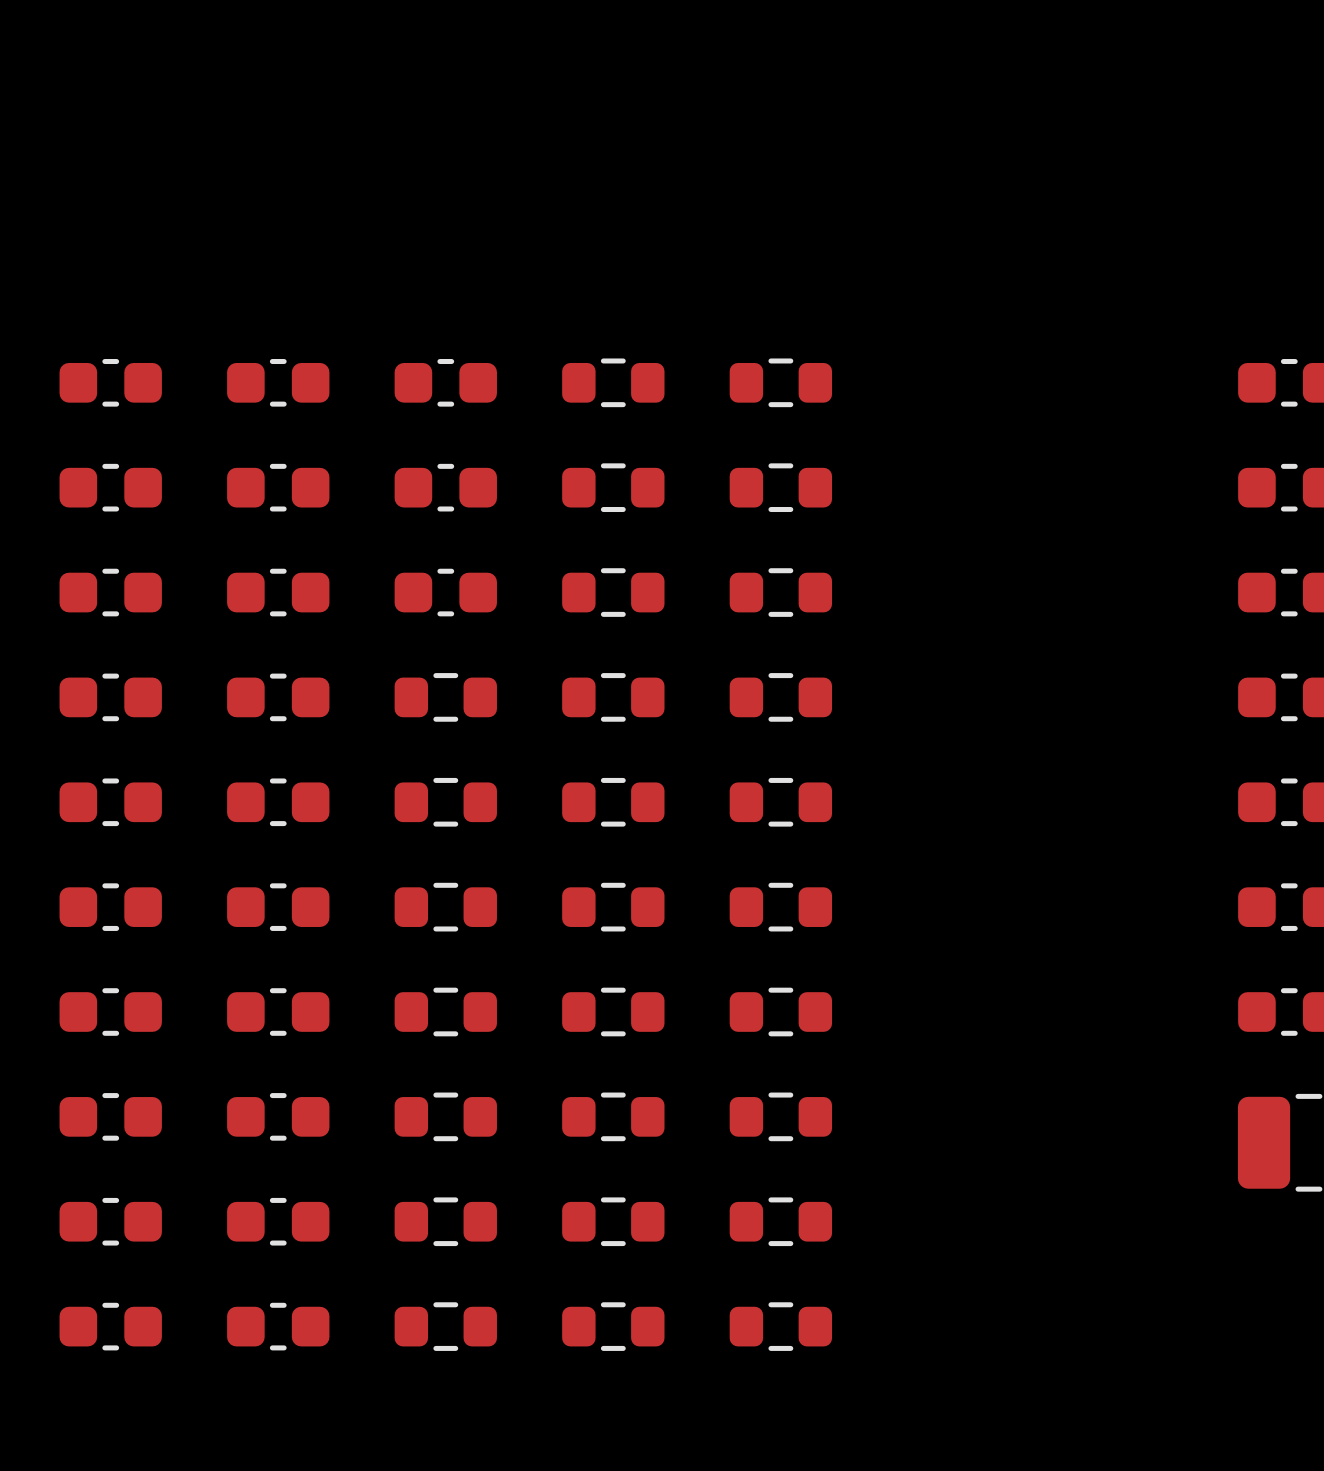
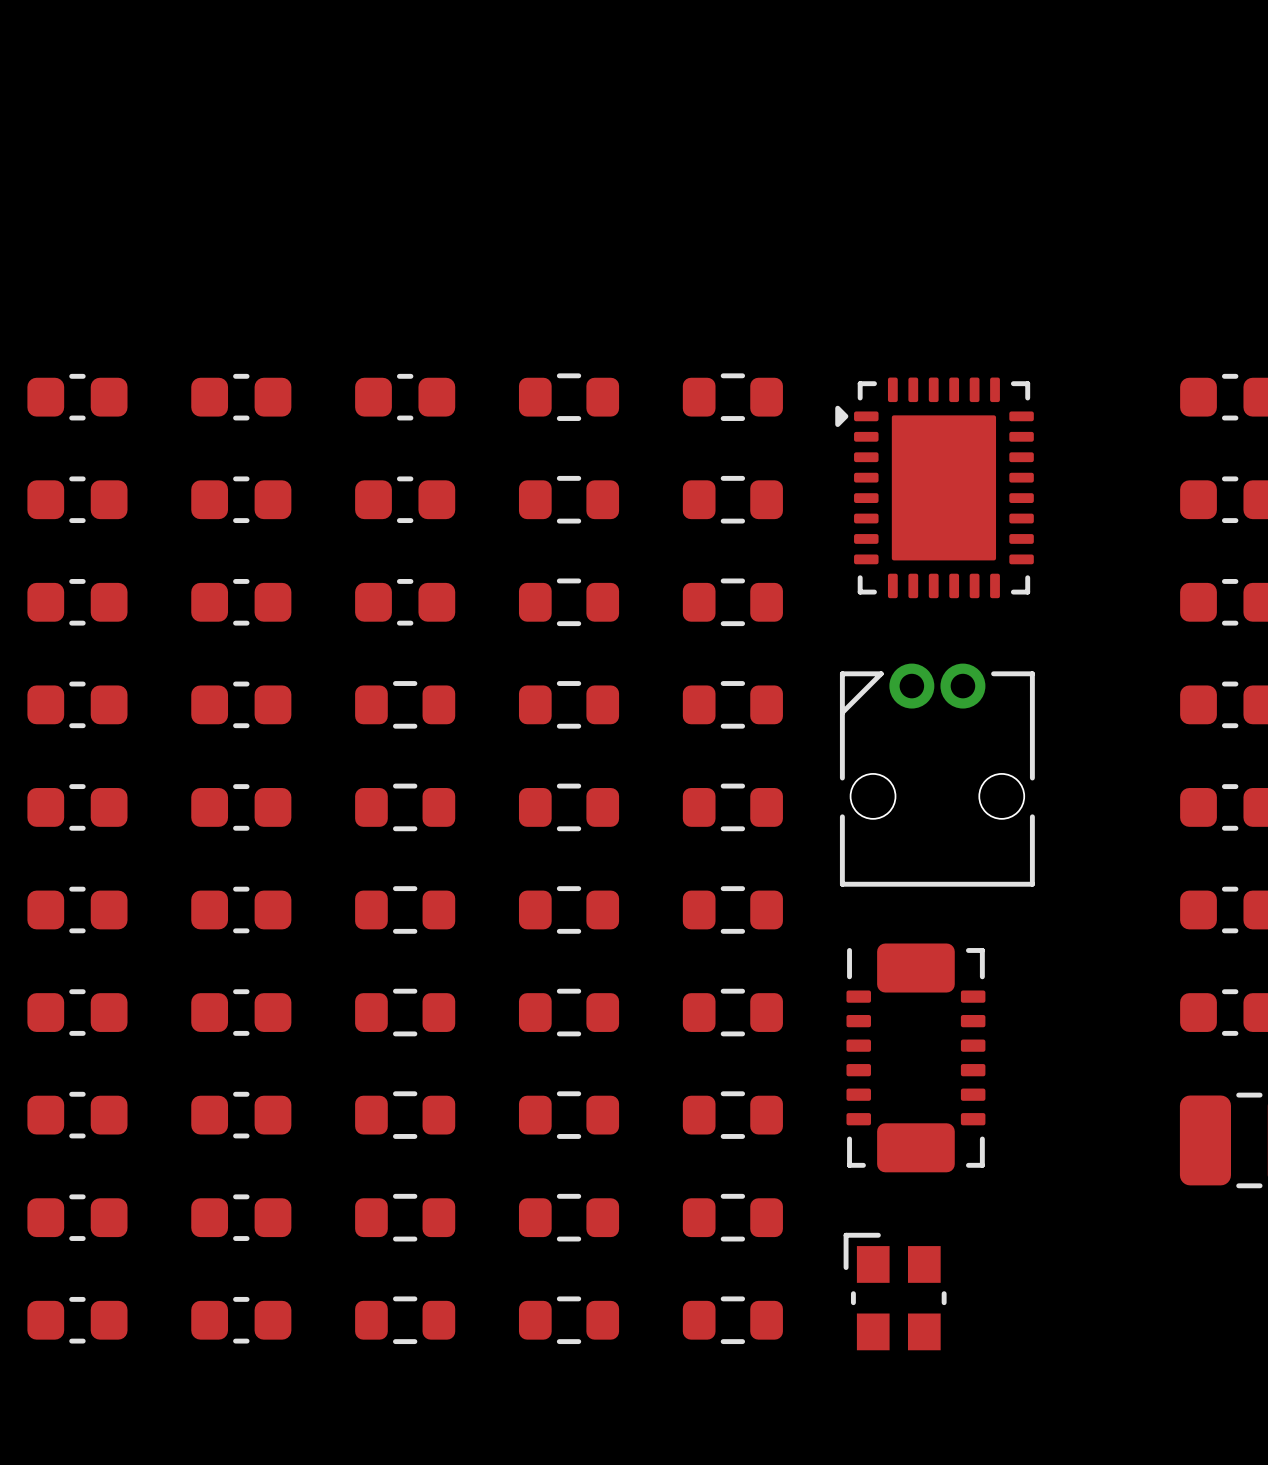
part: none -> (934, 487)
part: none -> (937, 775)
part: none -> (915, 1057)
part: none -> (895, 1291)

